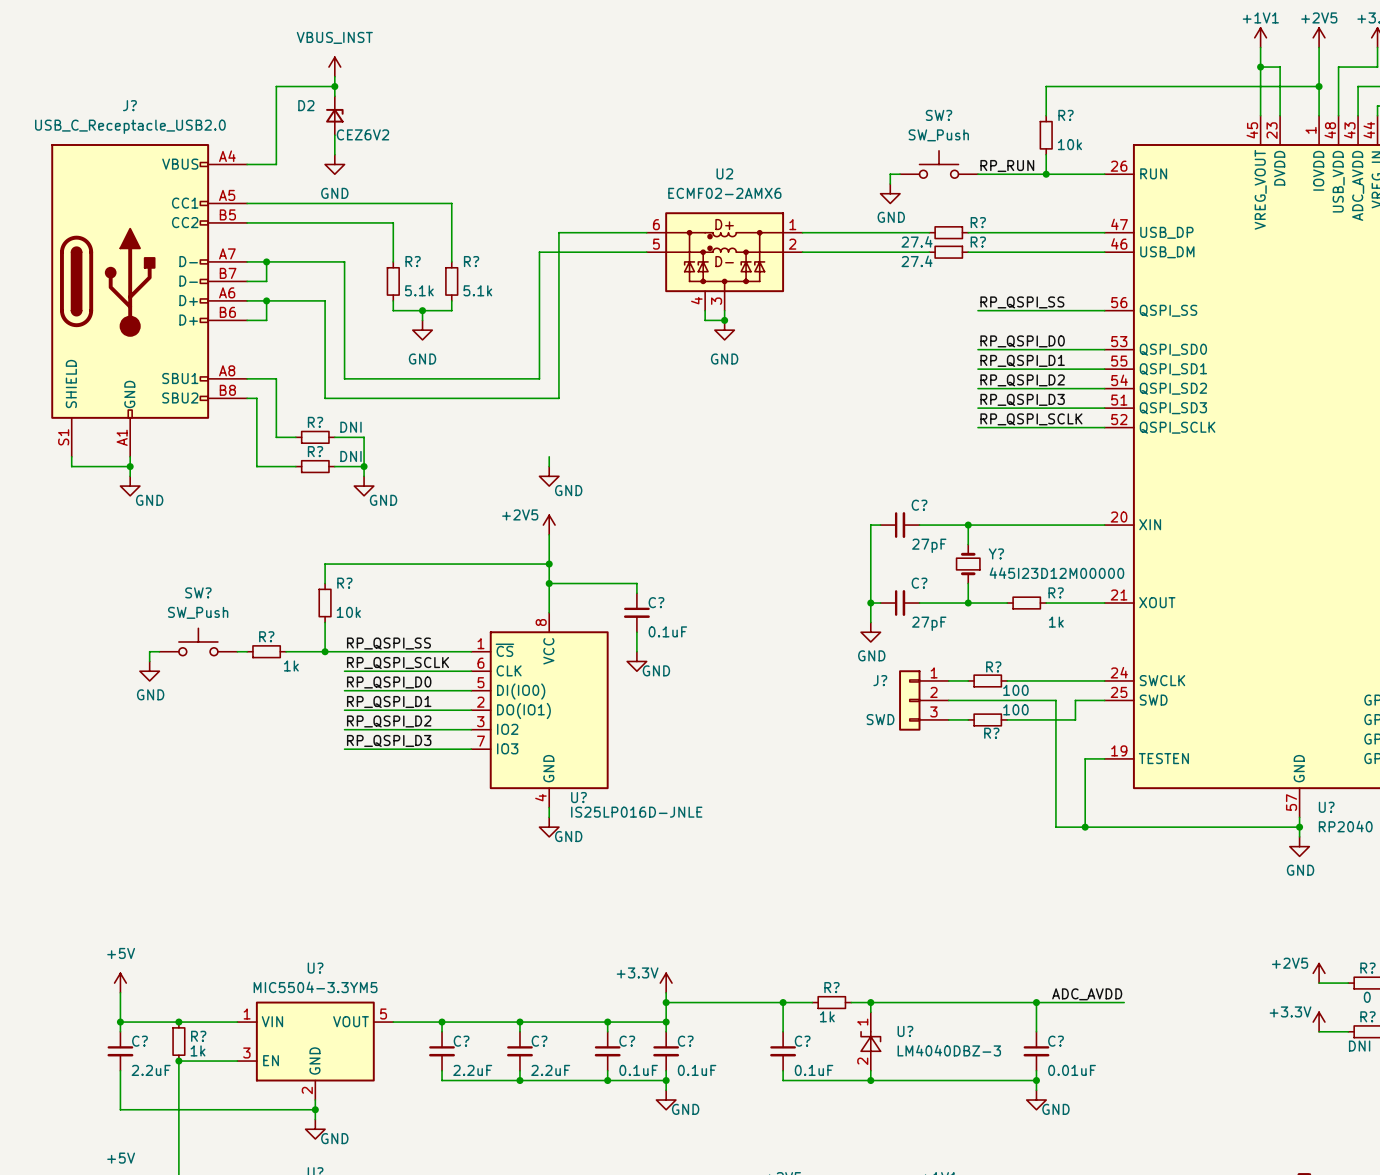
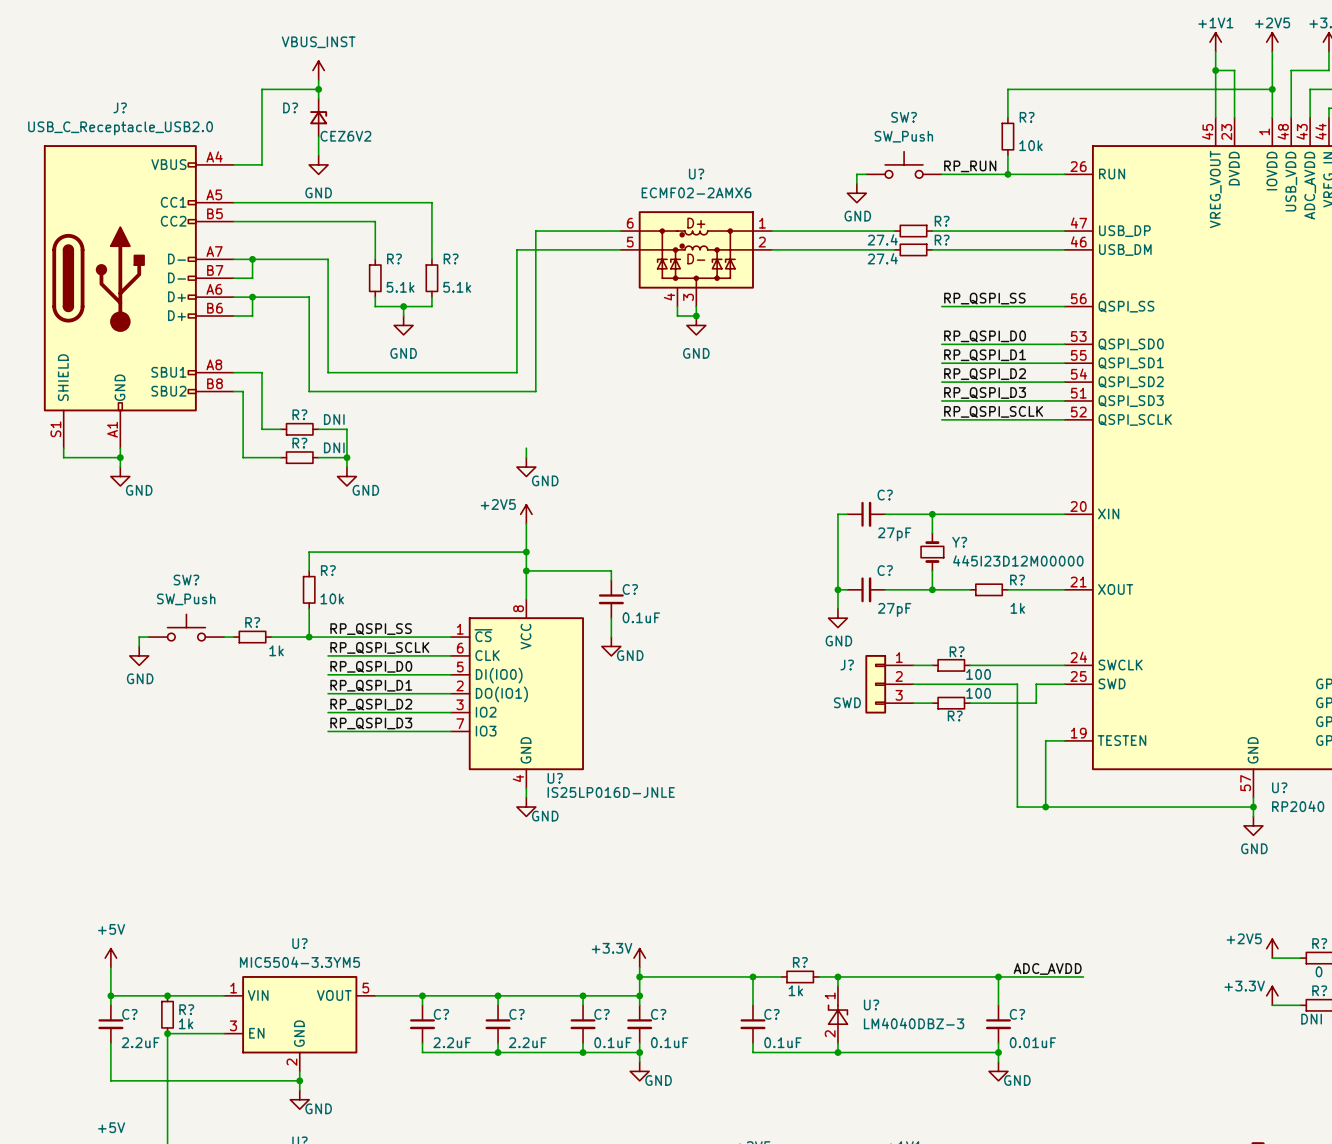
D2 name: D2 (306, 105) -> D? (290, 107)
U2 name: U2 (724, 173) -> U? (696, 174)

